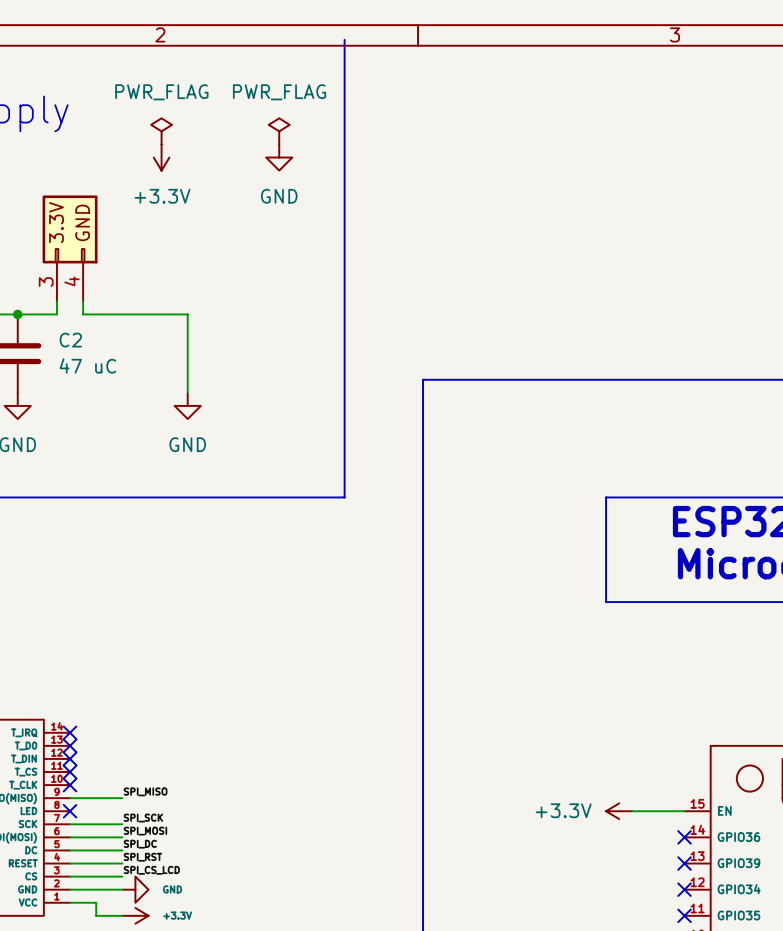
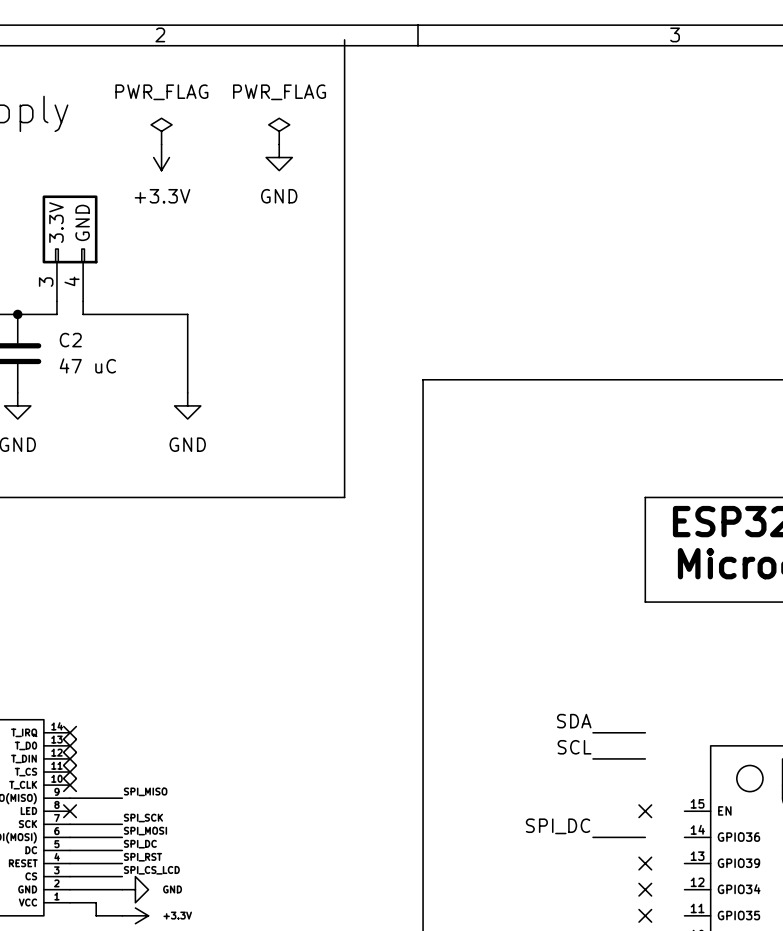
line: (645, 497) (606, 497) (606, 602) (645, 602) -> (645, 497) (645, 602)
label: none -> SDA (574, 721)
wire: none -> (593, 732) (645, 732)
label: none -> SCL (574, 747)
wire: none -> (593, 758) (645, 758)
power symbol: +3.3V (619, 811) -> none
wire: (632, 811) (684, 811) -> (593, 837) (645, 837)
no-connect mark: none -> (645, 811)
label: none -> SPI_DC (558, 826)
no-connect mark: (684, 837) -> none
no-connect mark: none -> (645, 863)
no-connect mark: (684, 863) -> none
no-connect mark: none -> (645, 889)
no-connect mark: (684, 889) -> none
no-connect mark: none -> (645, 915)
no-connect mark: (684, 915) -> none

